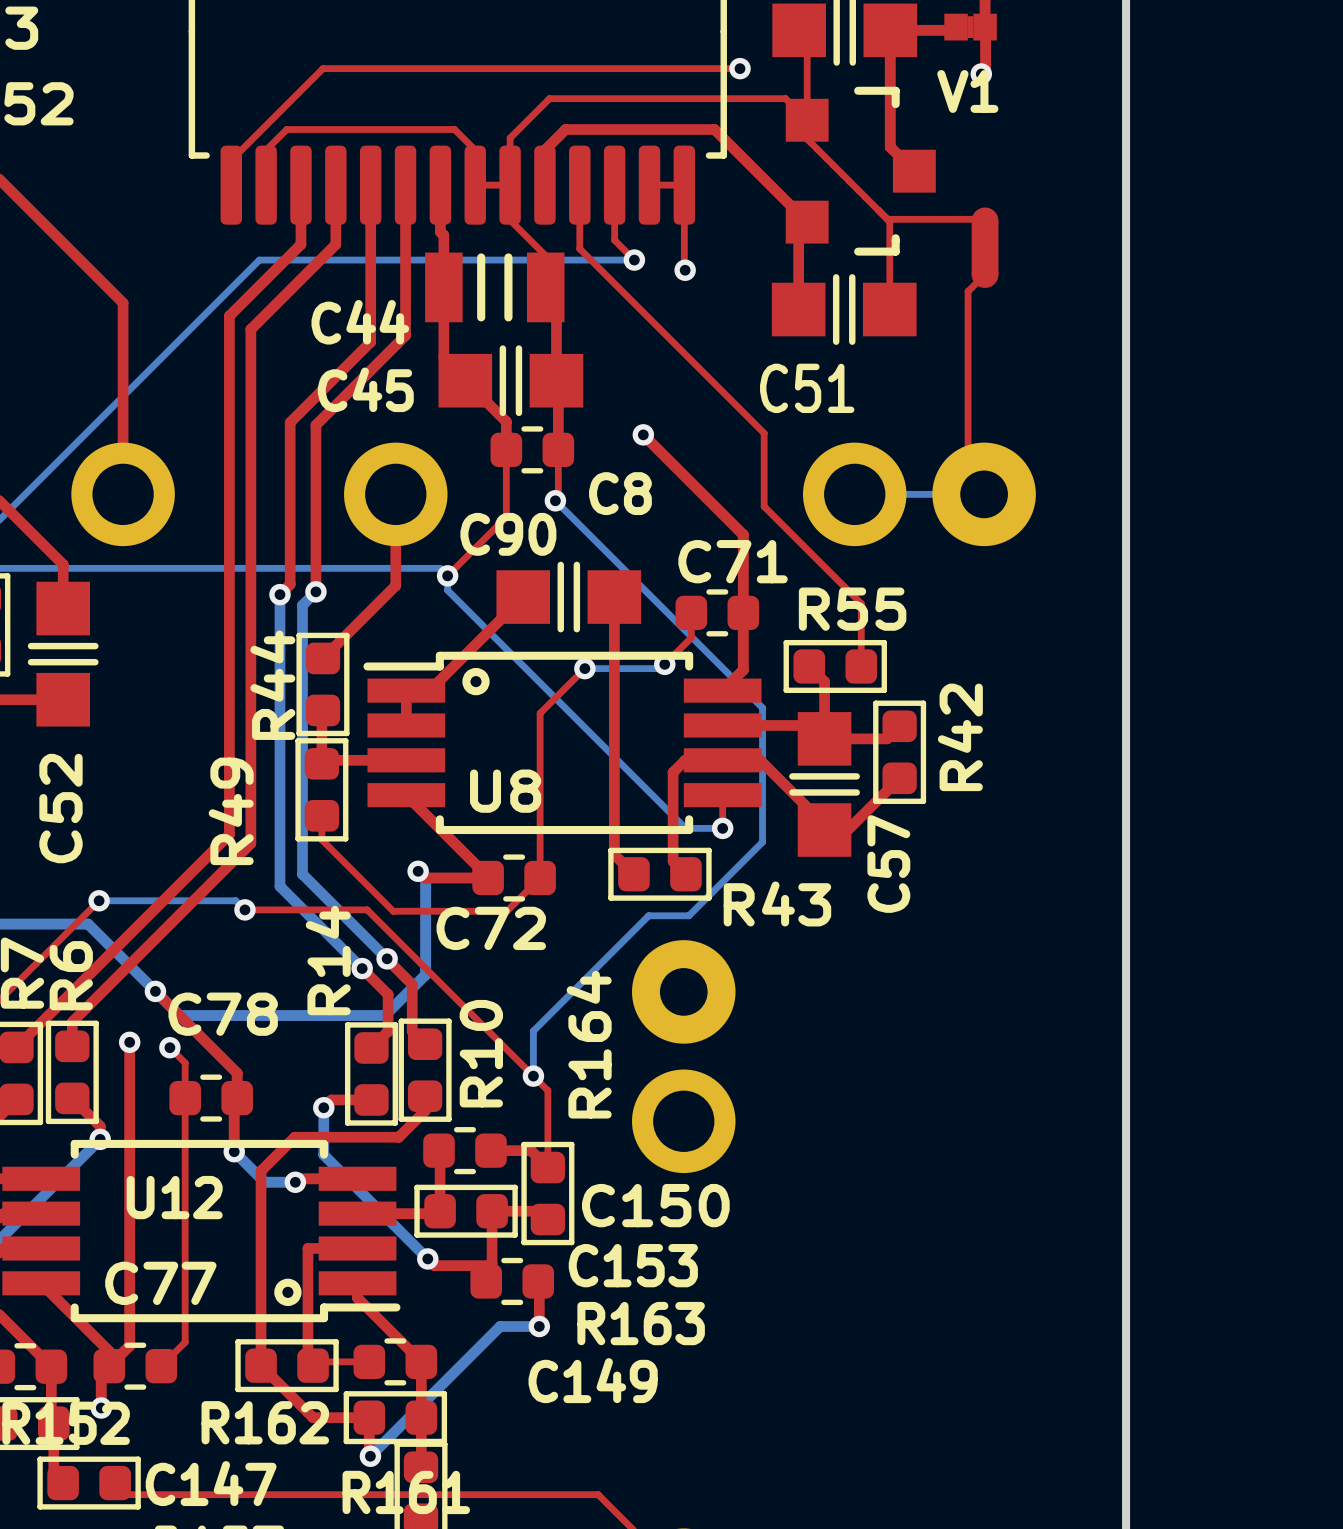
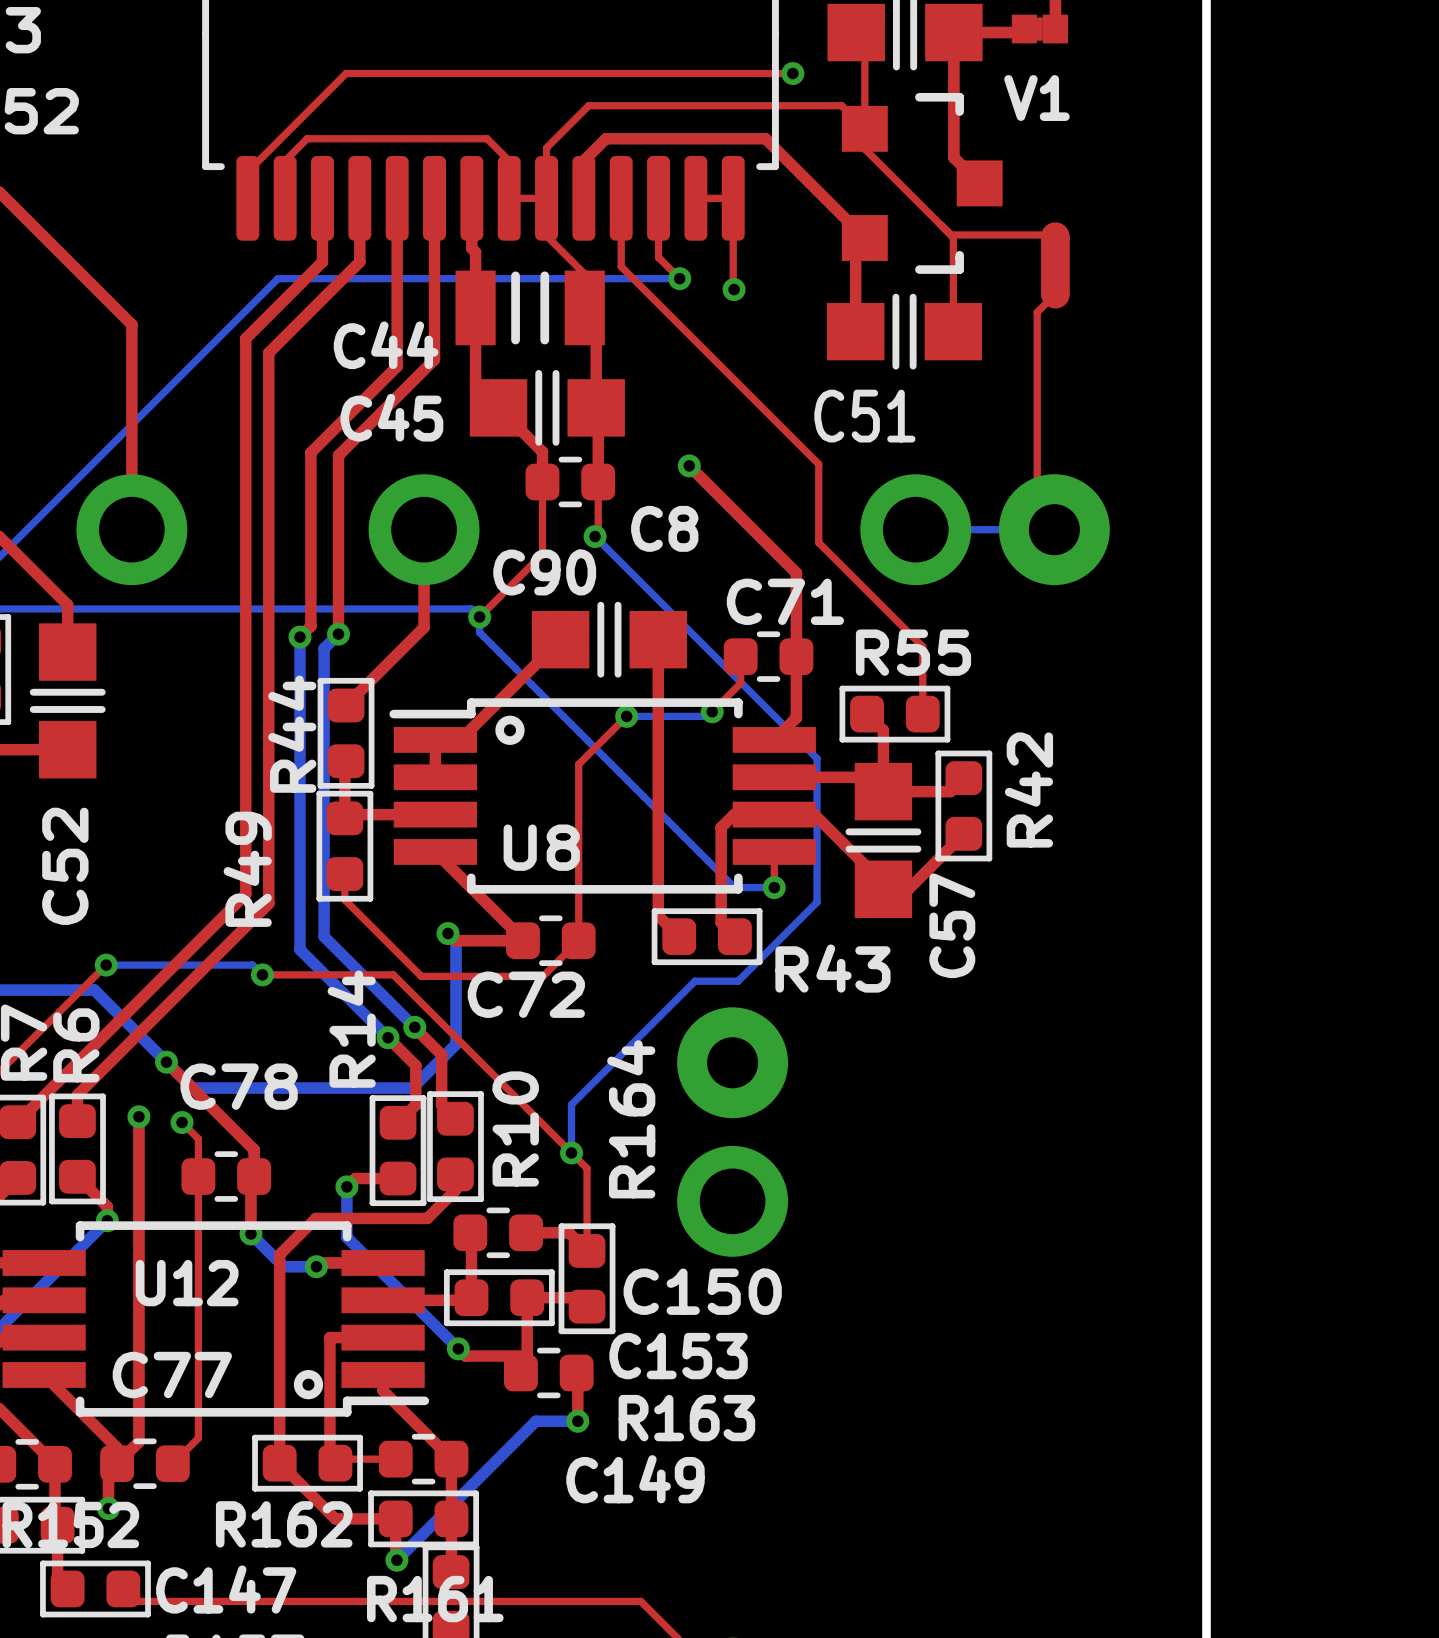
top track: (985, 27) (985, 69) (981, 74) -> none
via: (981, 74) -> none

